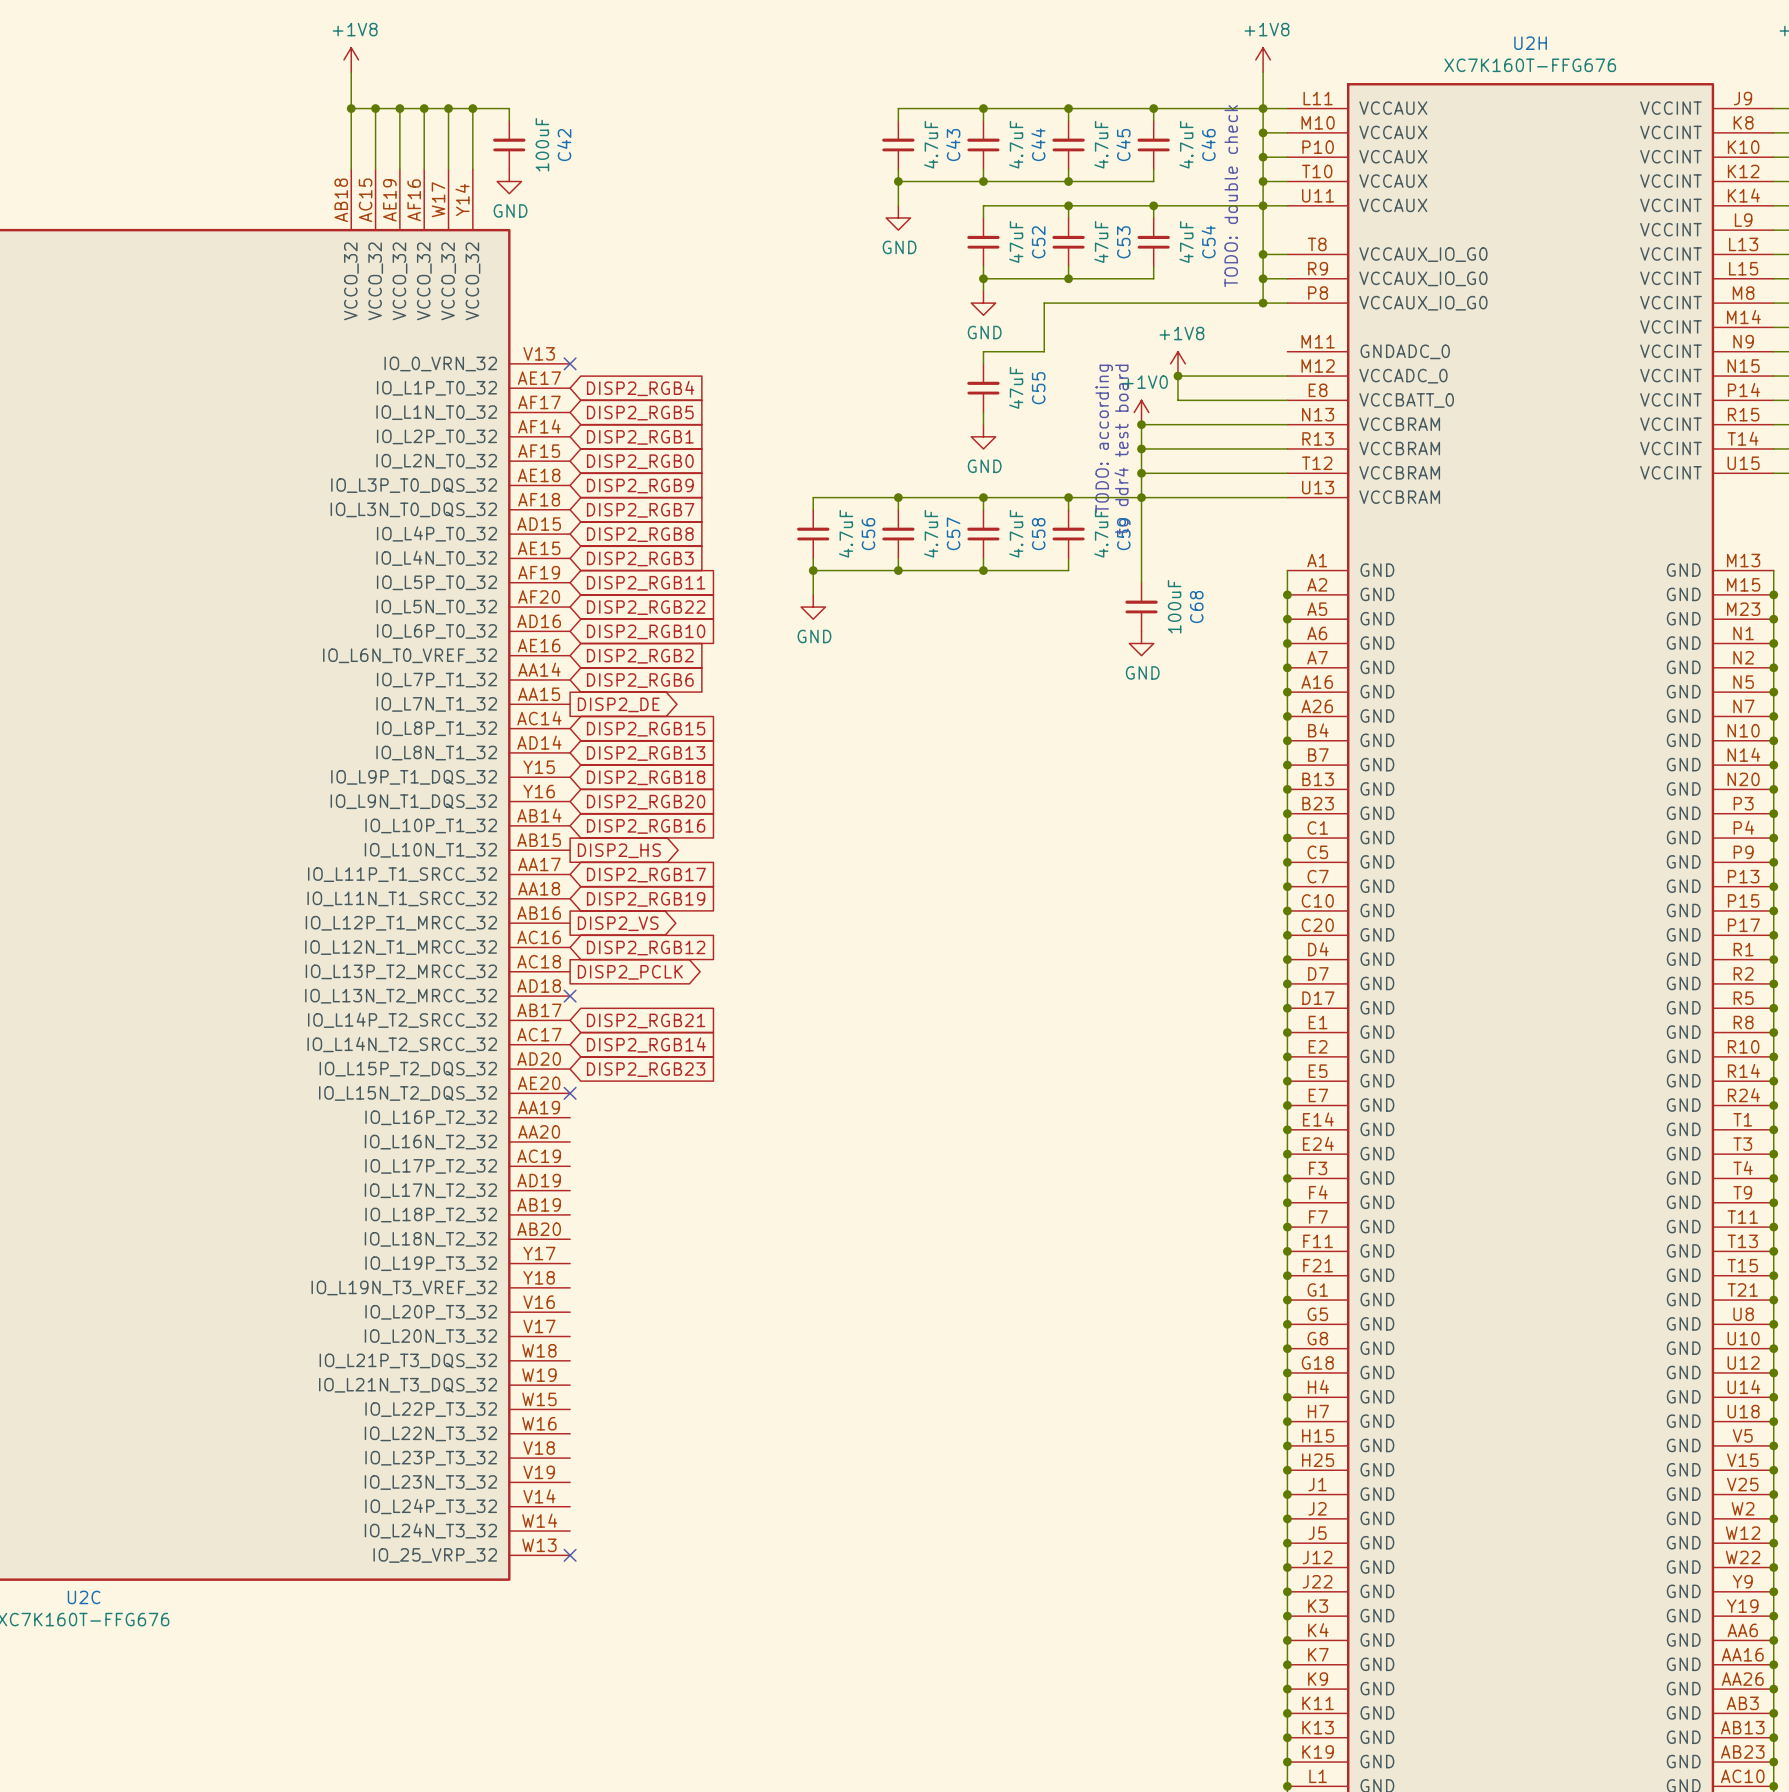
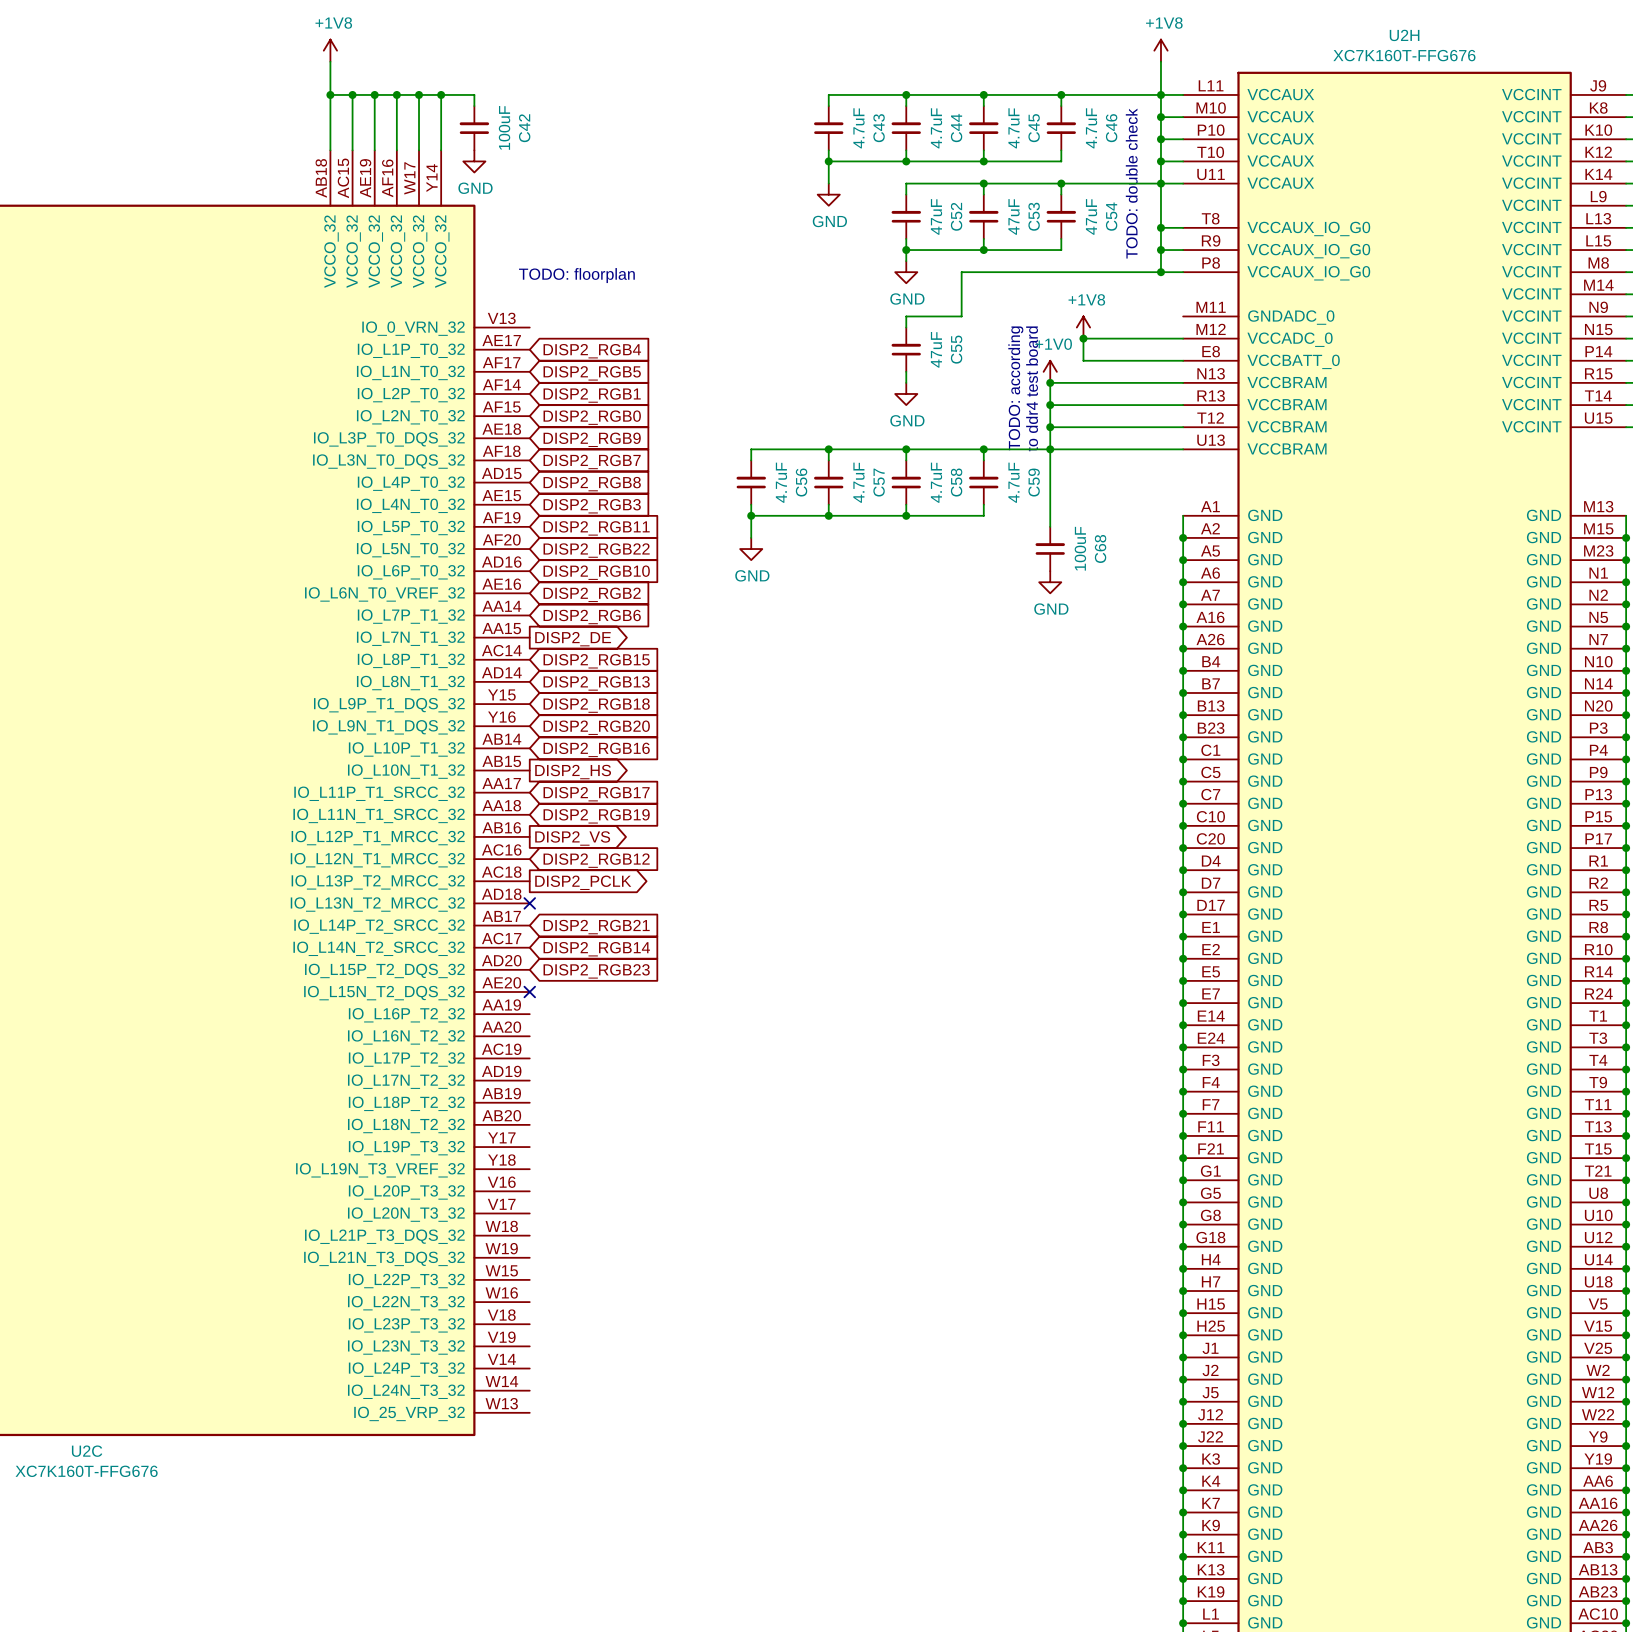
text: none -> TODO: floorplan (576, 275)
no-connect mark: (570, 363) -> none
no-connect mark: (570, 1555) -> none

